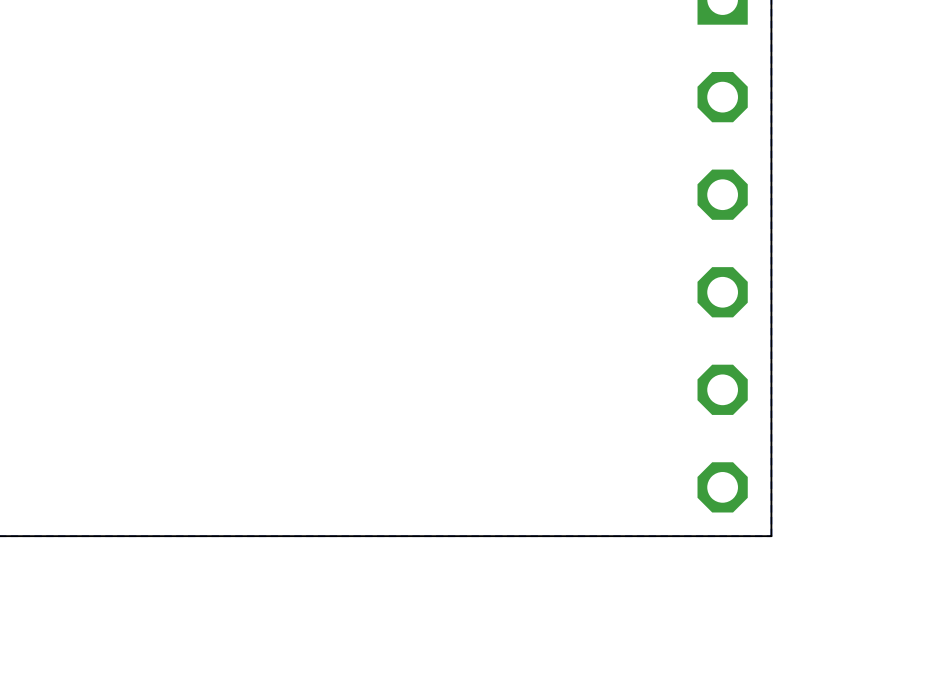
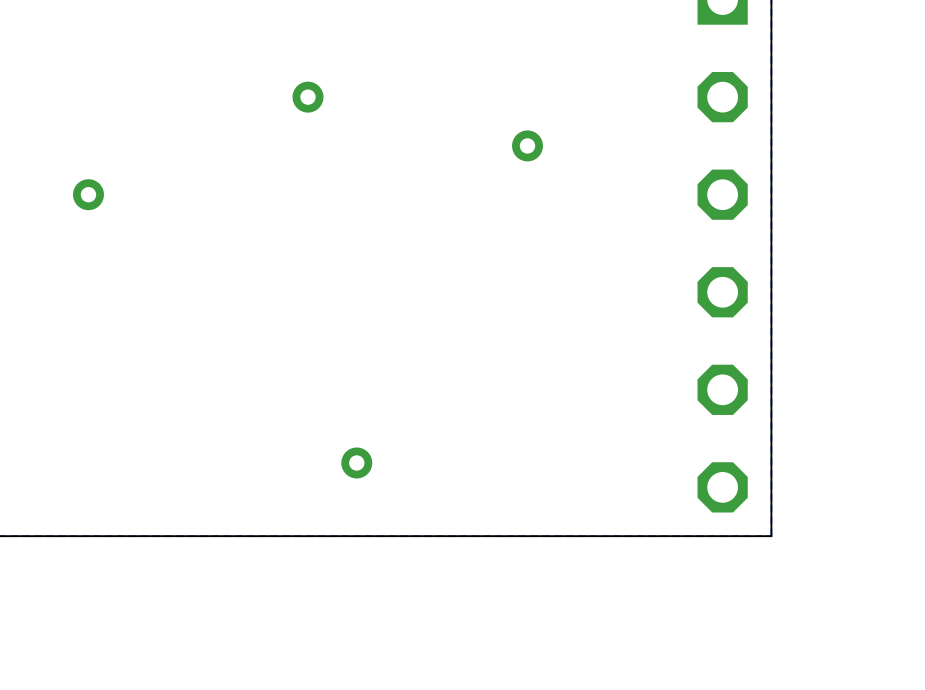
via: none -> (308, 97)
via: none -> (527, 145)
via: none -> (88, 194)
via: none -> (356, 462)

